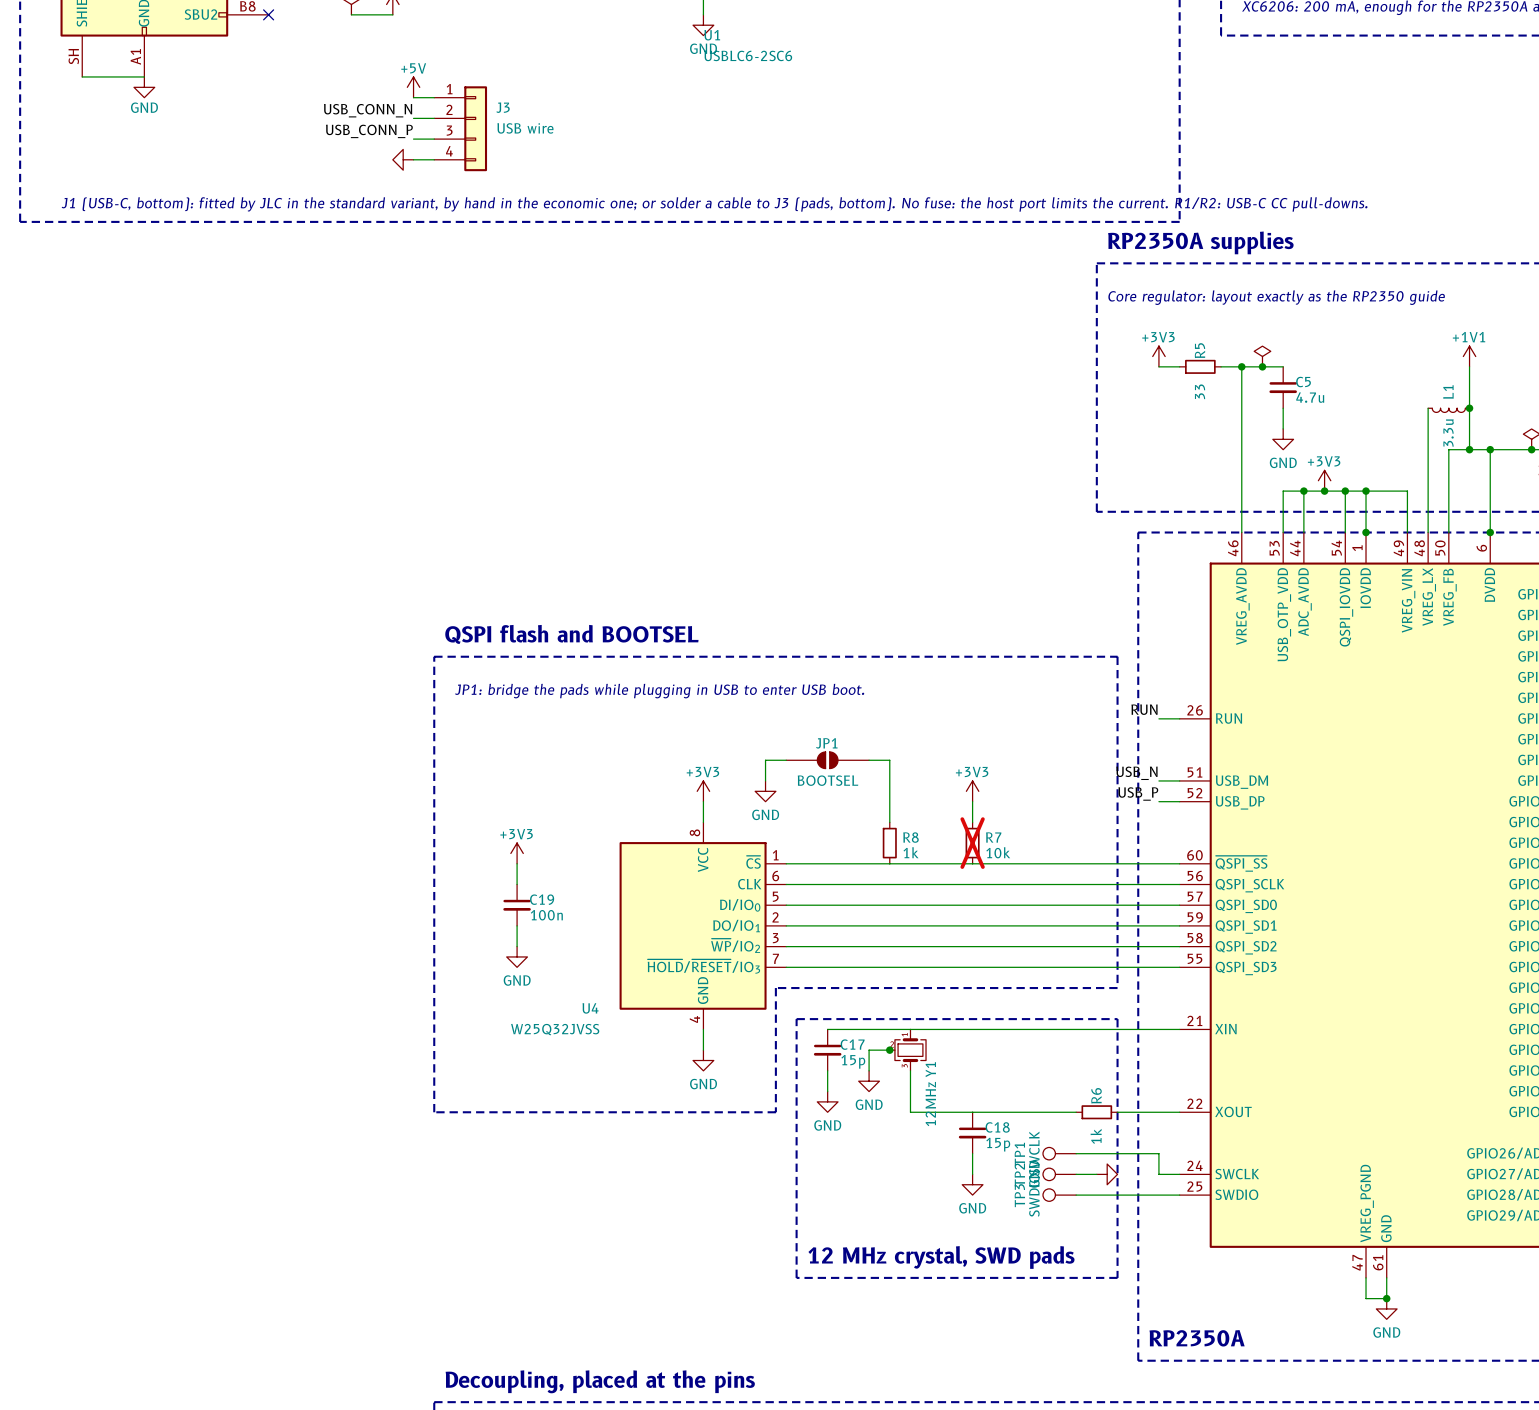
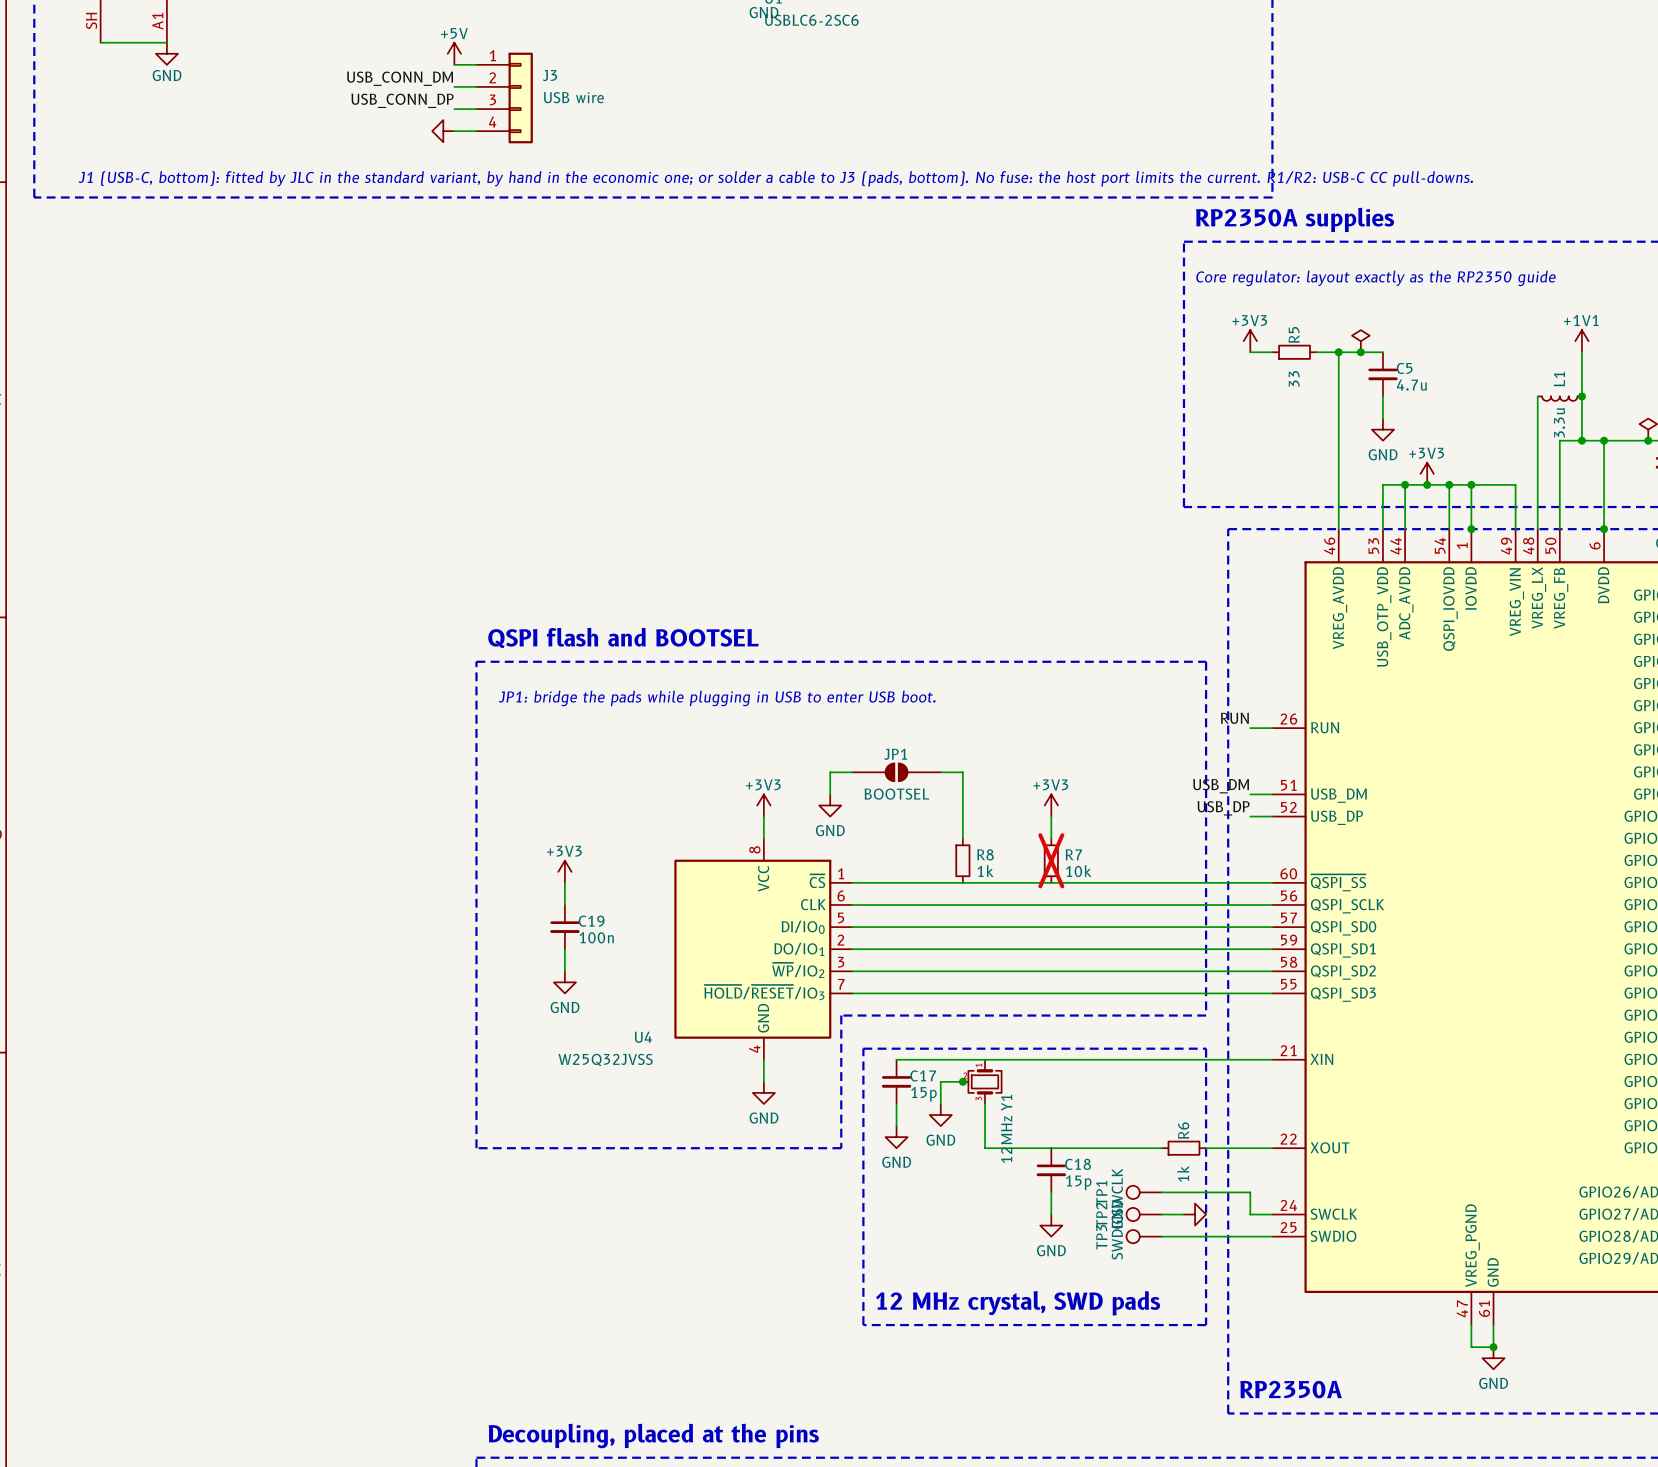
label: USB_CONN_N (368, 110) -> USB_CONN_DM (400, 78)
label: USB_CONN_P (369, 131) -> USB_CONN_DP (402, 100)
label: USB_N (1136, 773) -> USB_DM (1221, 786)
label: USB_P (1138, 793) -> USB_DP (1223, 808)

